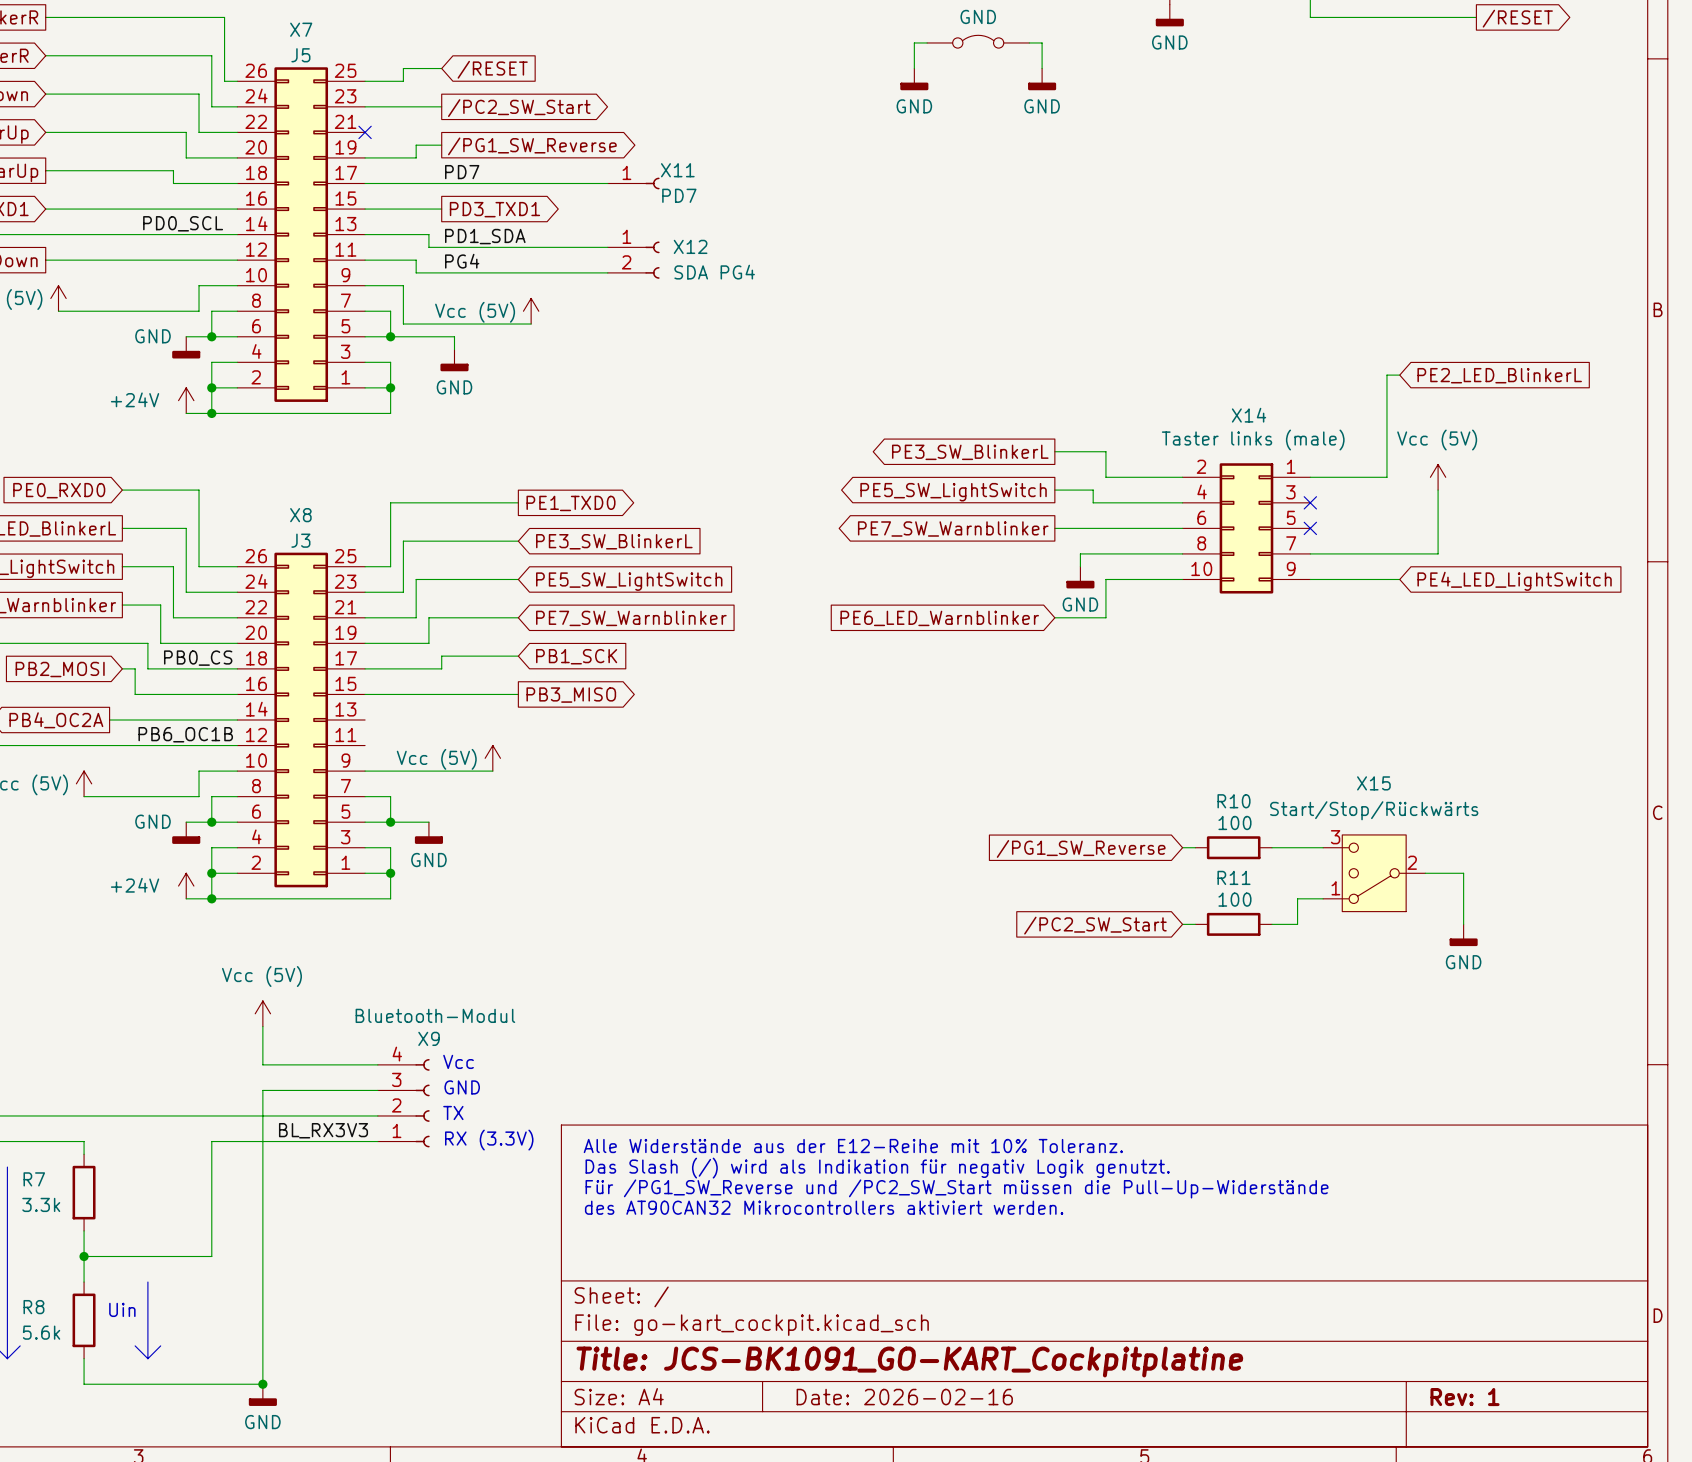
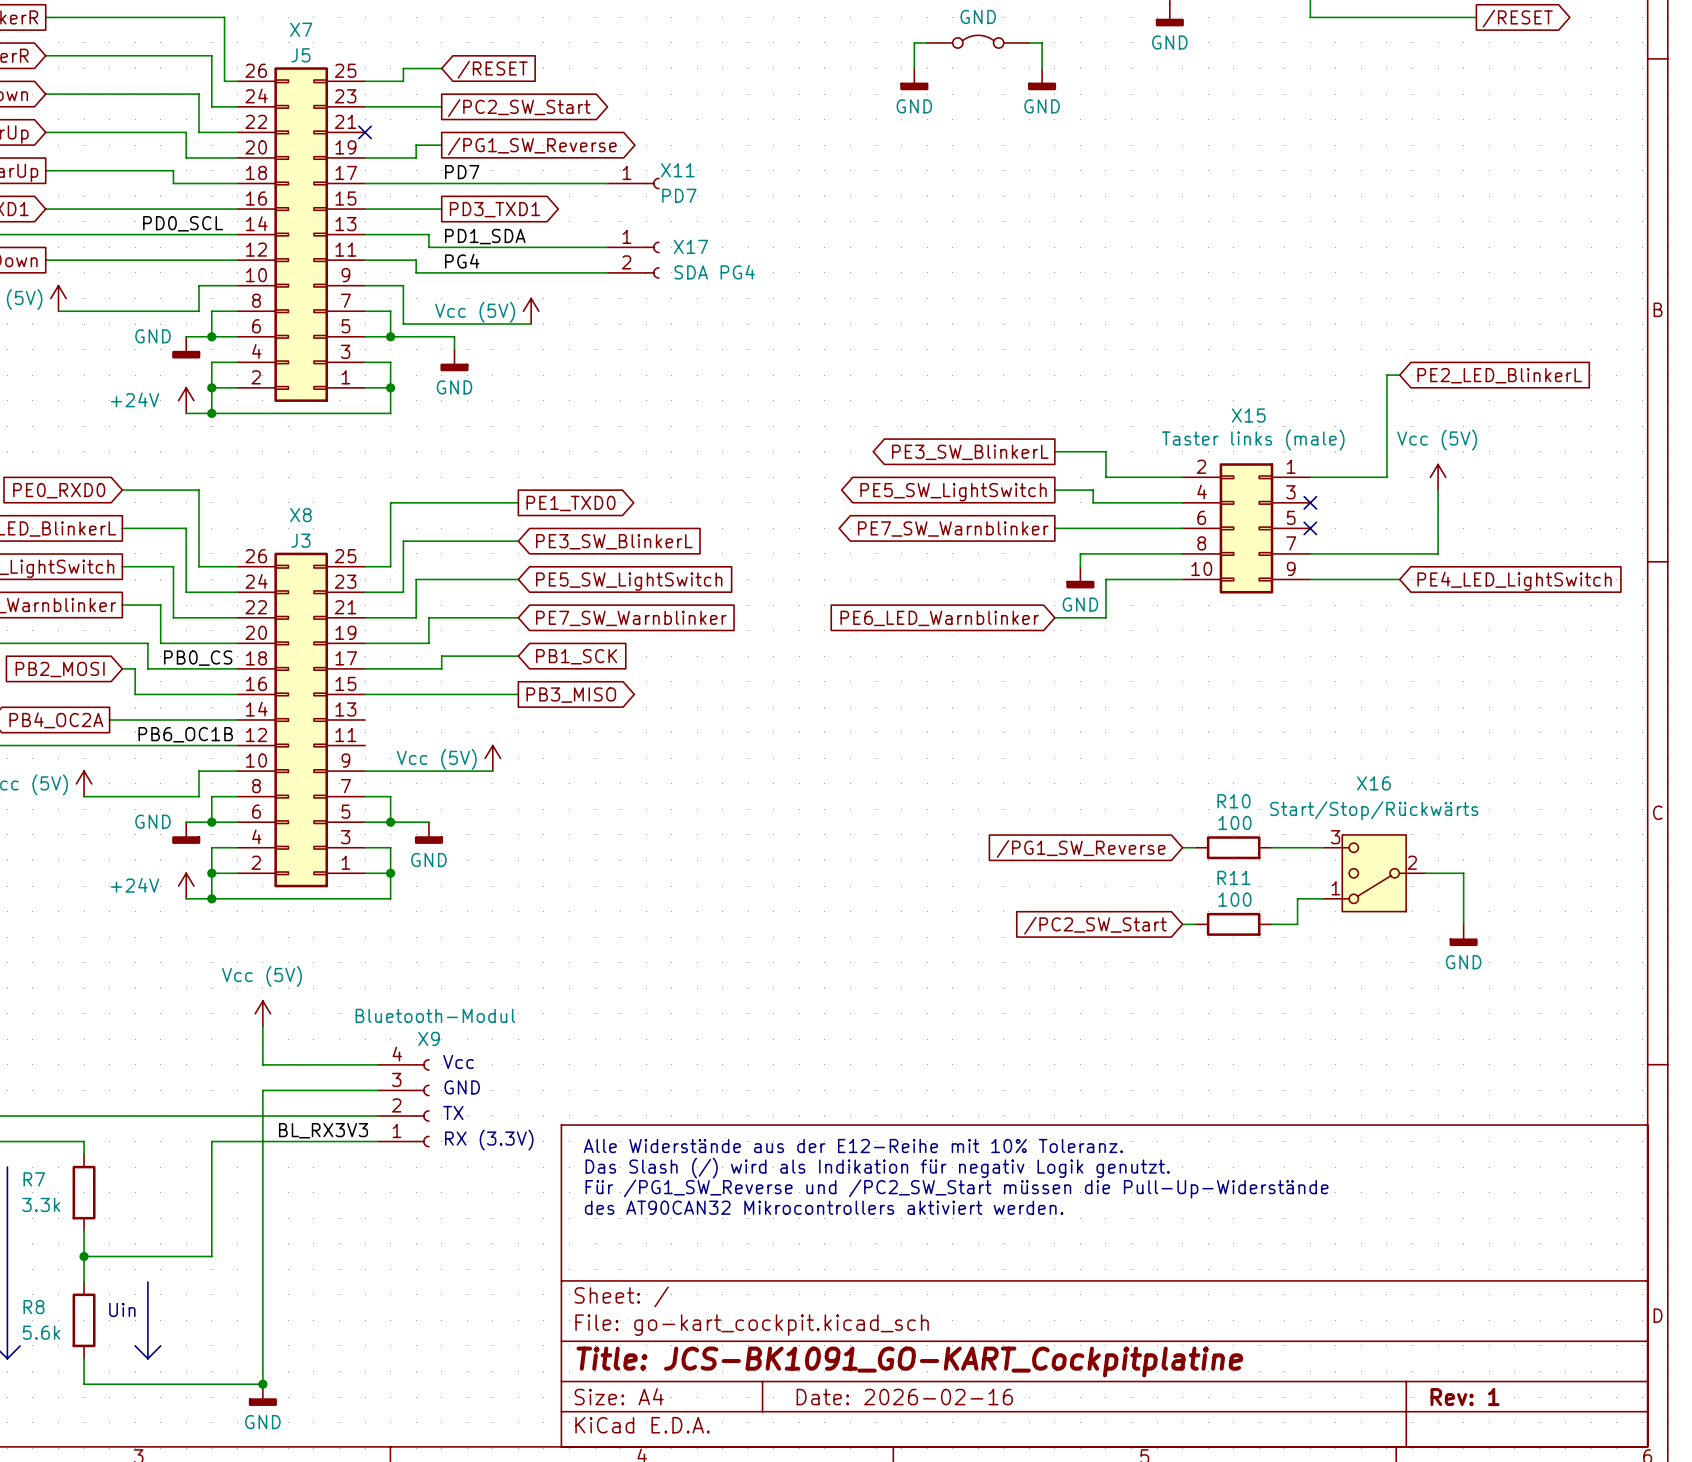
X12 name: X12 (690, 246) -> X17 (690, 246)
X14 name: X14 (1249, 415) -> X15 (1248, 415)
X15 name: X15 (1373, 783) -> X16 (1373, 783)

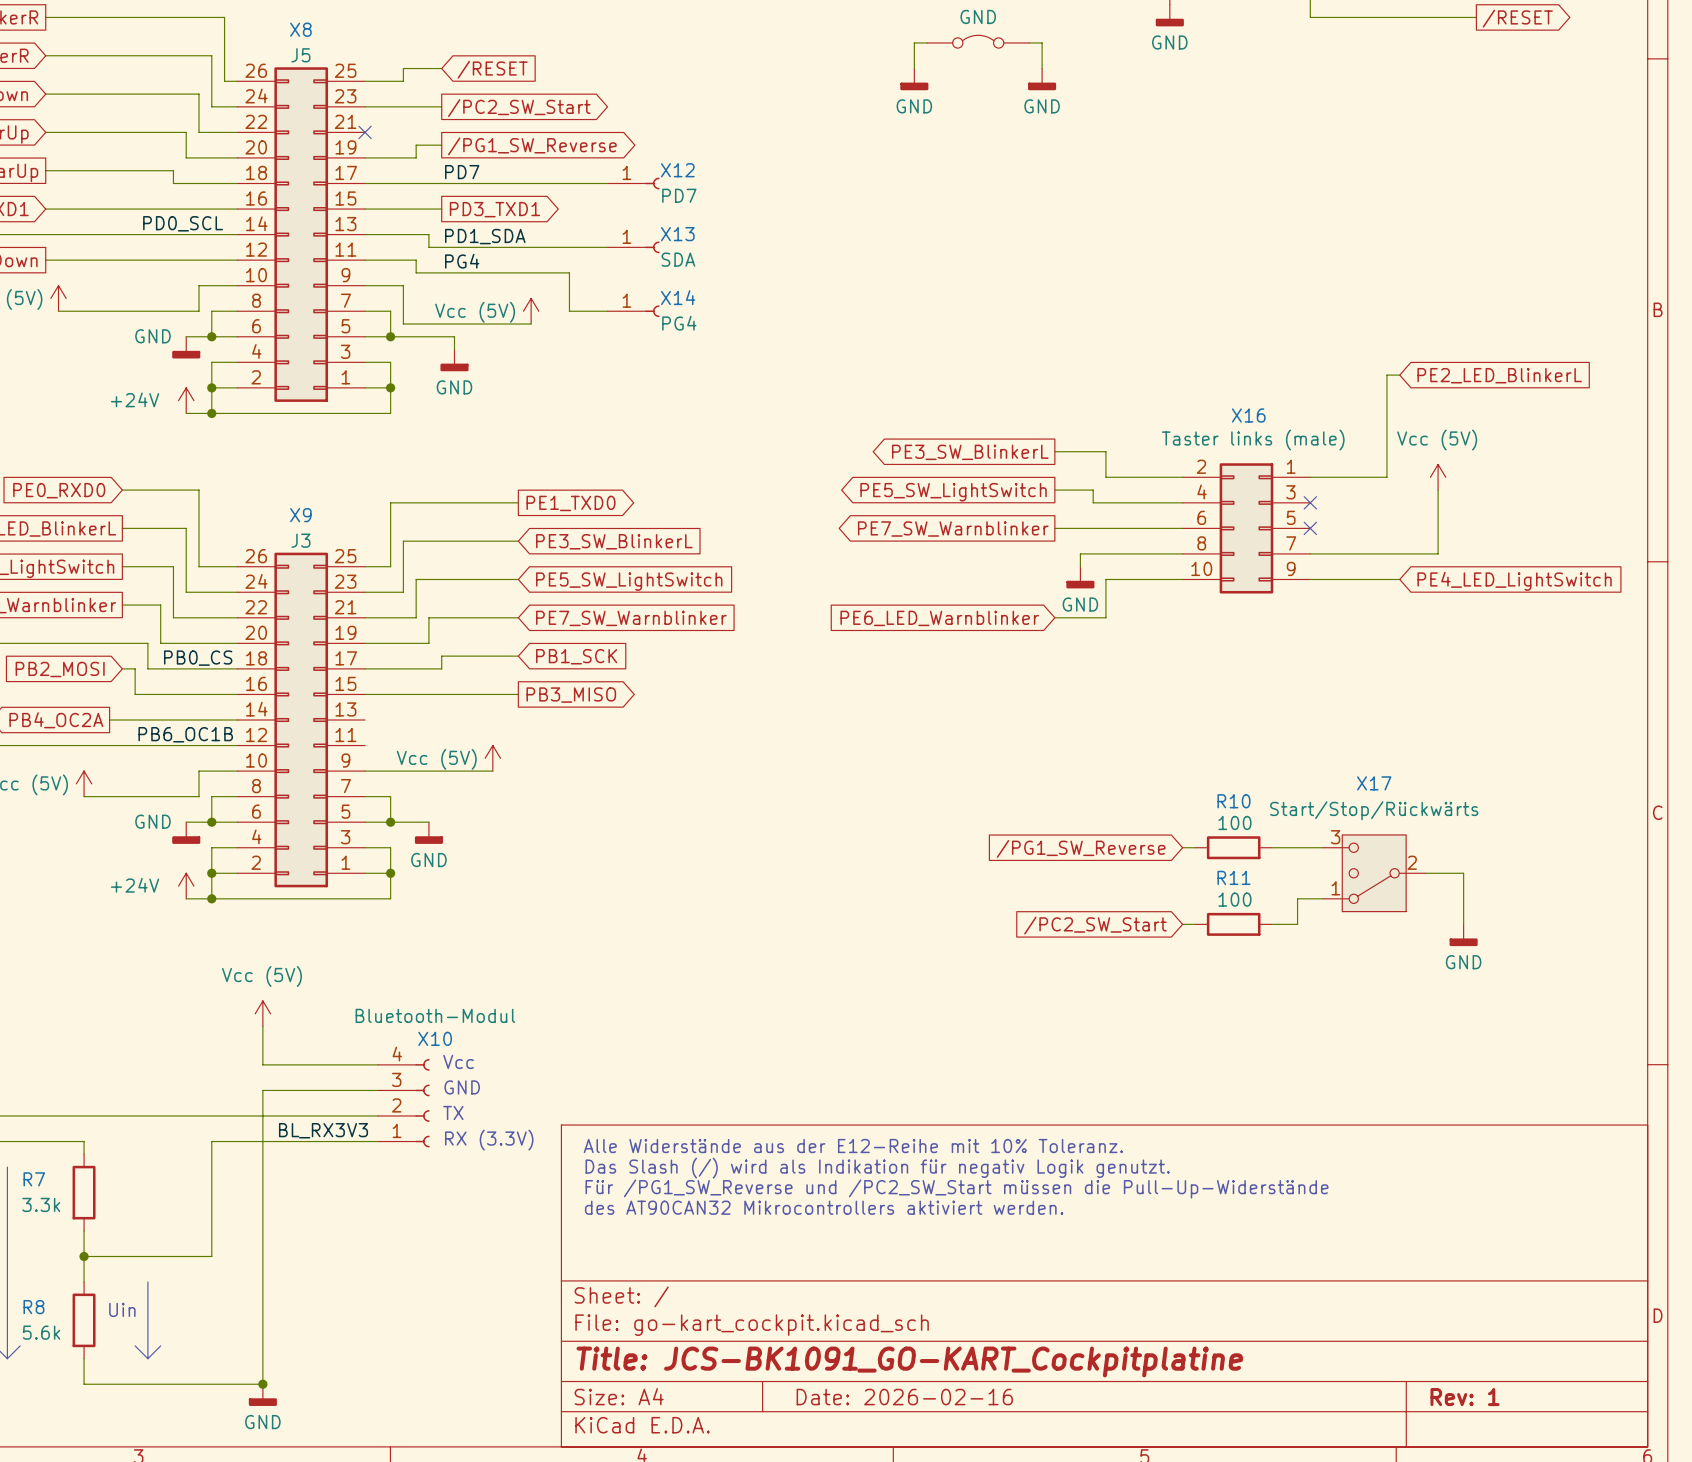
X7 name: X7 (301, 29) -> X8 (300, 29)
X11 name: X11 (677, 170) -> X12 (677, 170)
X13: none -> SDA (633, 247)
X17: SDA PG4 (633, 260) -> none
wire: (569, 272) (607, 272) -> (569, 272) (569, 311) (607, 311)
X14: none -> PG4 (633, 311)
X15 name: X15 (1248, 415) -> X16 (1248, 415)
X8 name: X8 (300, 515) -> X9 (300, 515)
X16 name: X16 (1373, 783) -> X17 (1374, 783)
X9 name: X9 (429, 1038) -> X10 (435, 1038)

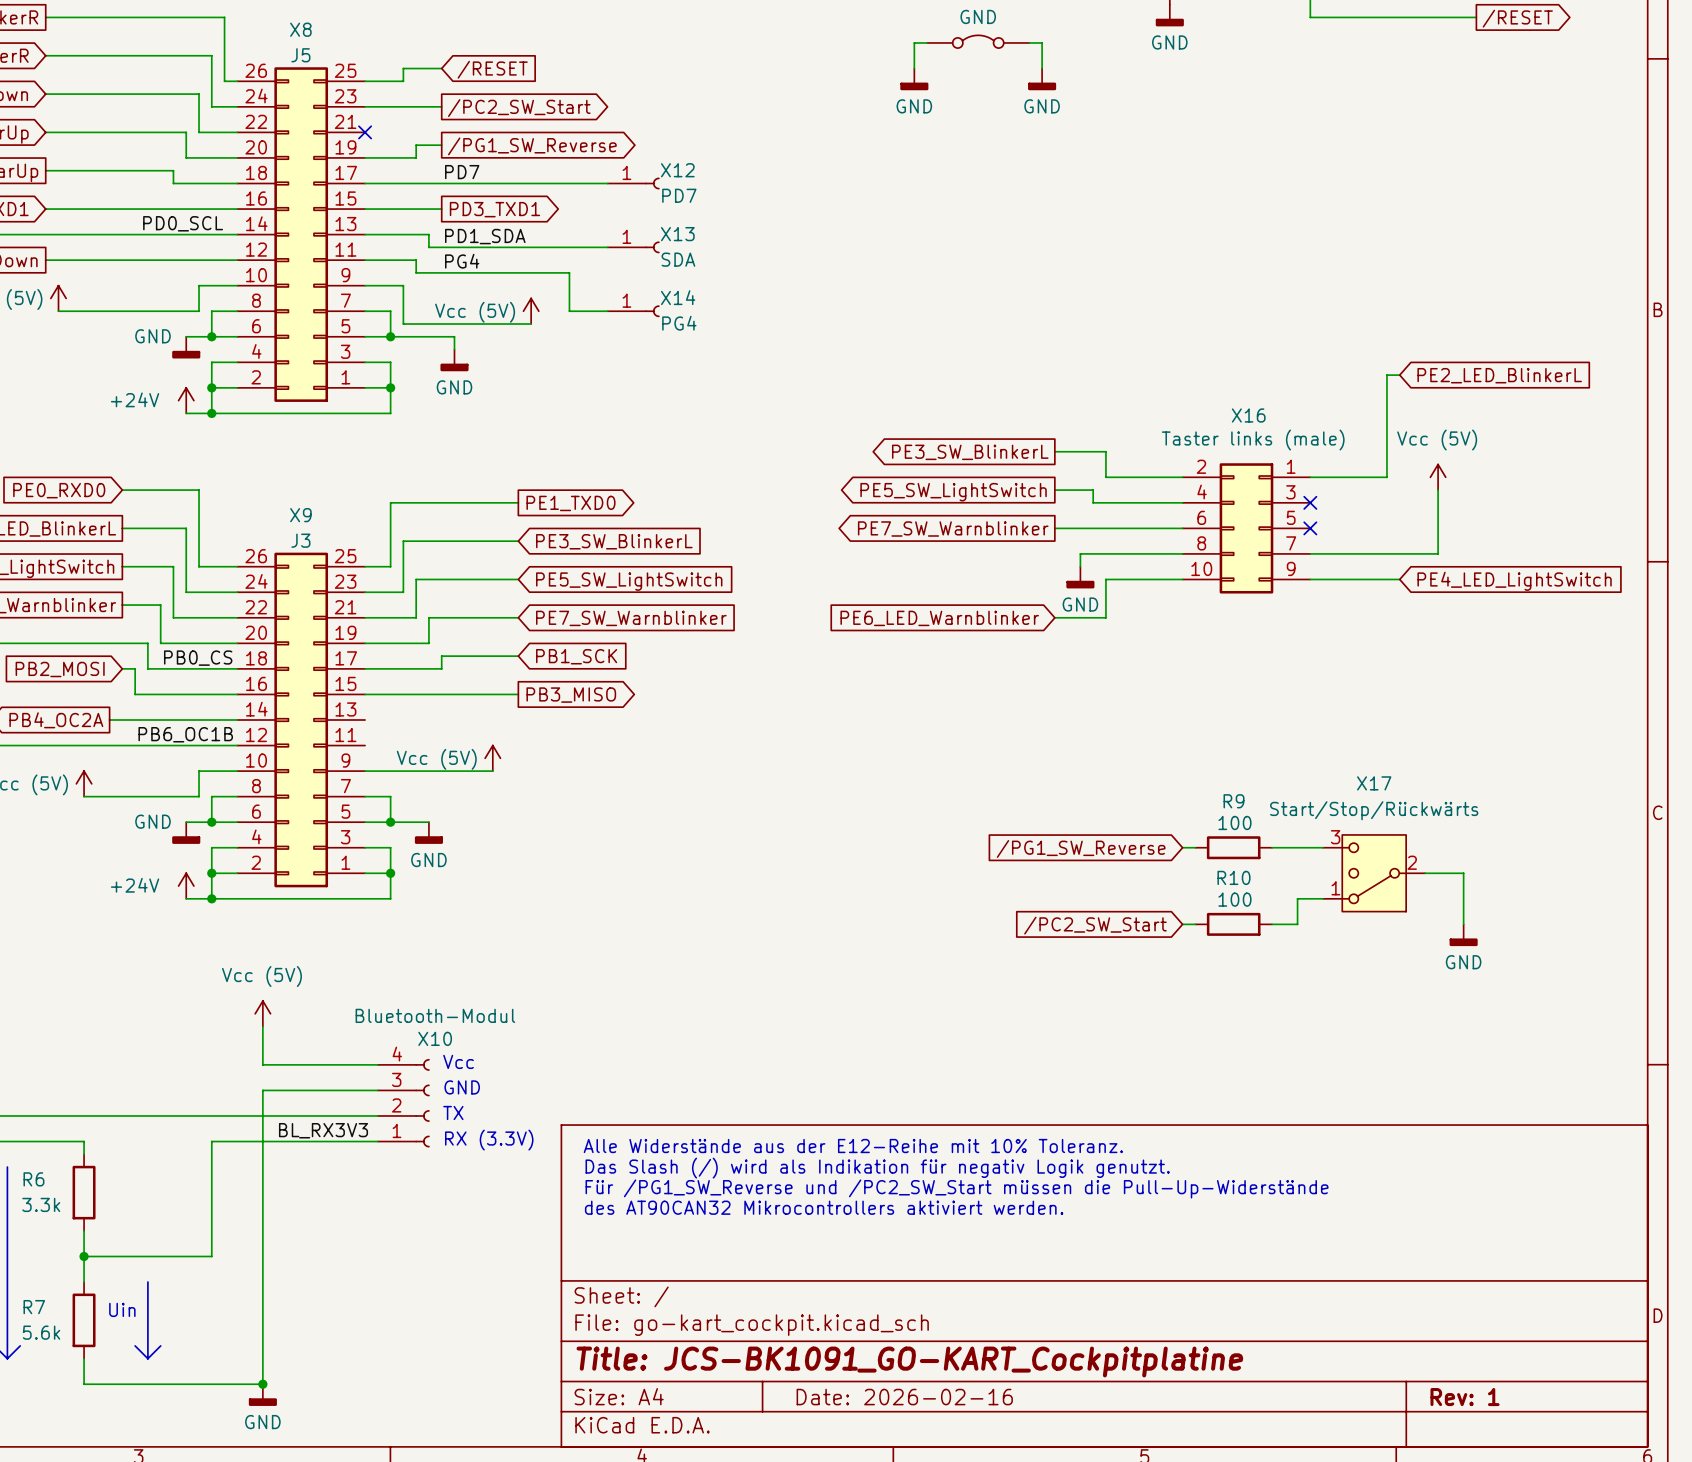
R10 name: R10 (1233, 801) -> R9 (1233, 801)
R11 name: R11 (1233, 877) -> R10 (1233, 877)
R7 name: R7 (34, 1179) -> R6 (33, 1179)
R8 name: R8 (33, 1307) -> R7 (34, 1307)

